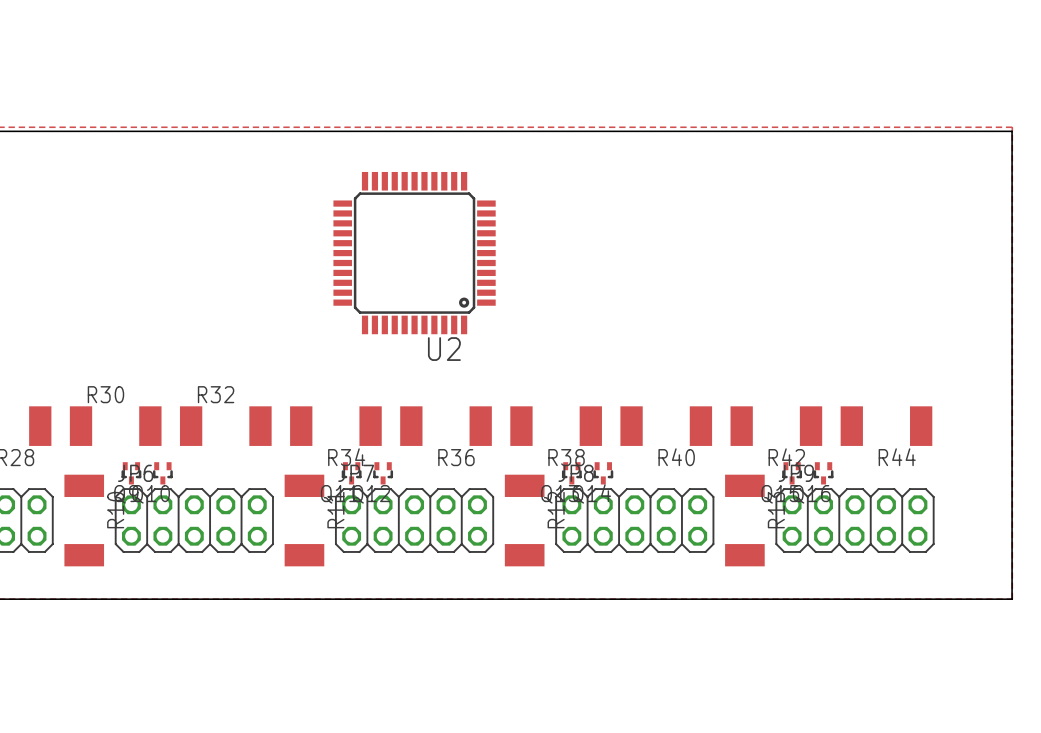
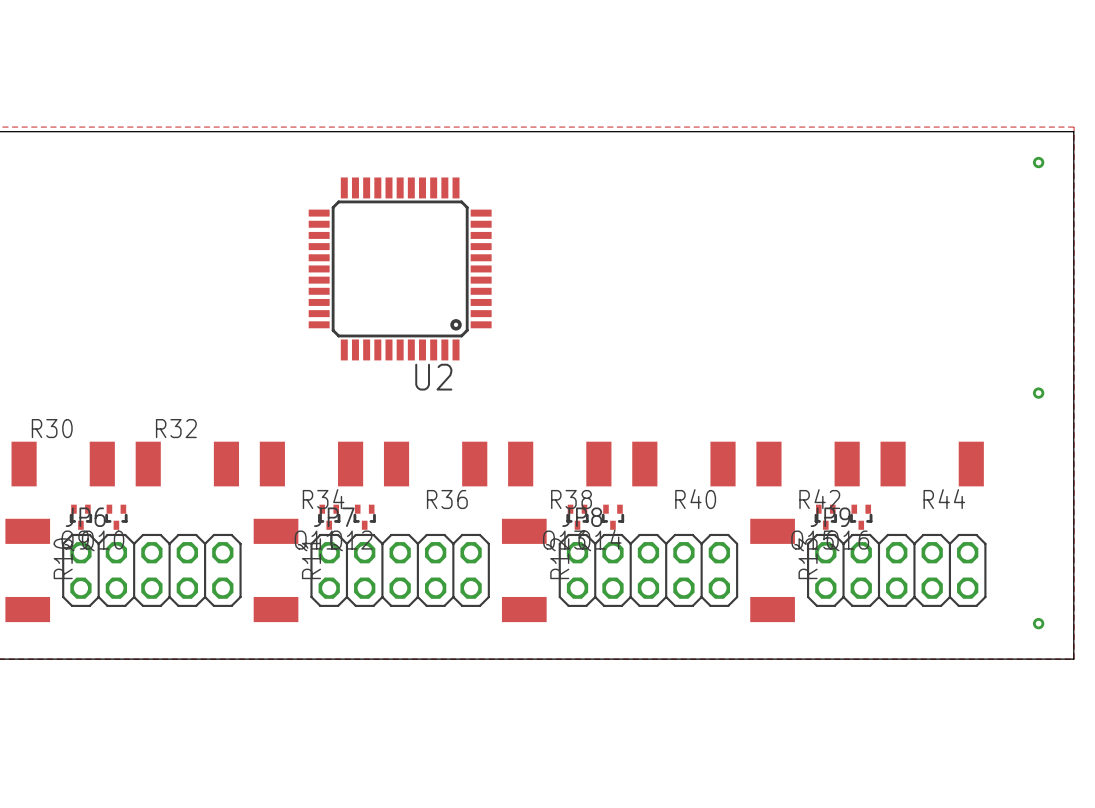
via: none -> (1038, 162)
via: none -> (1038, 393)
via: none -> (1038, 623)

